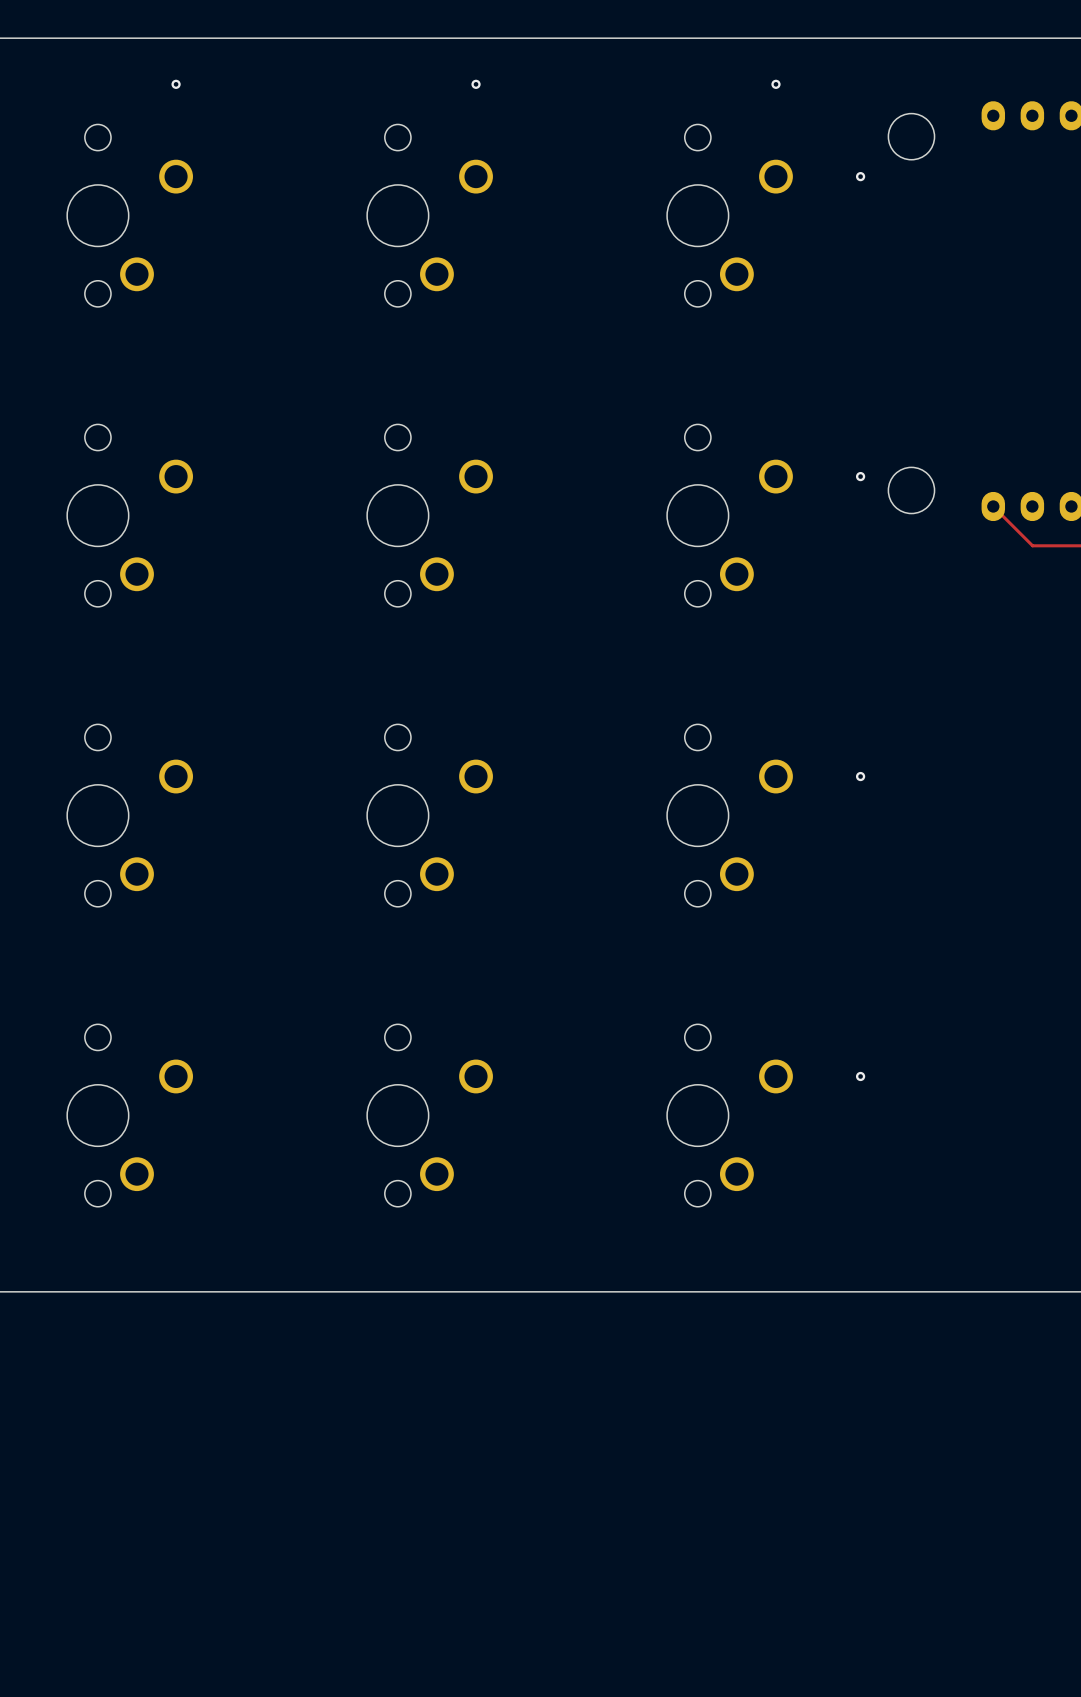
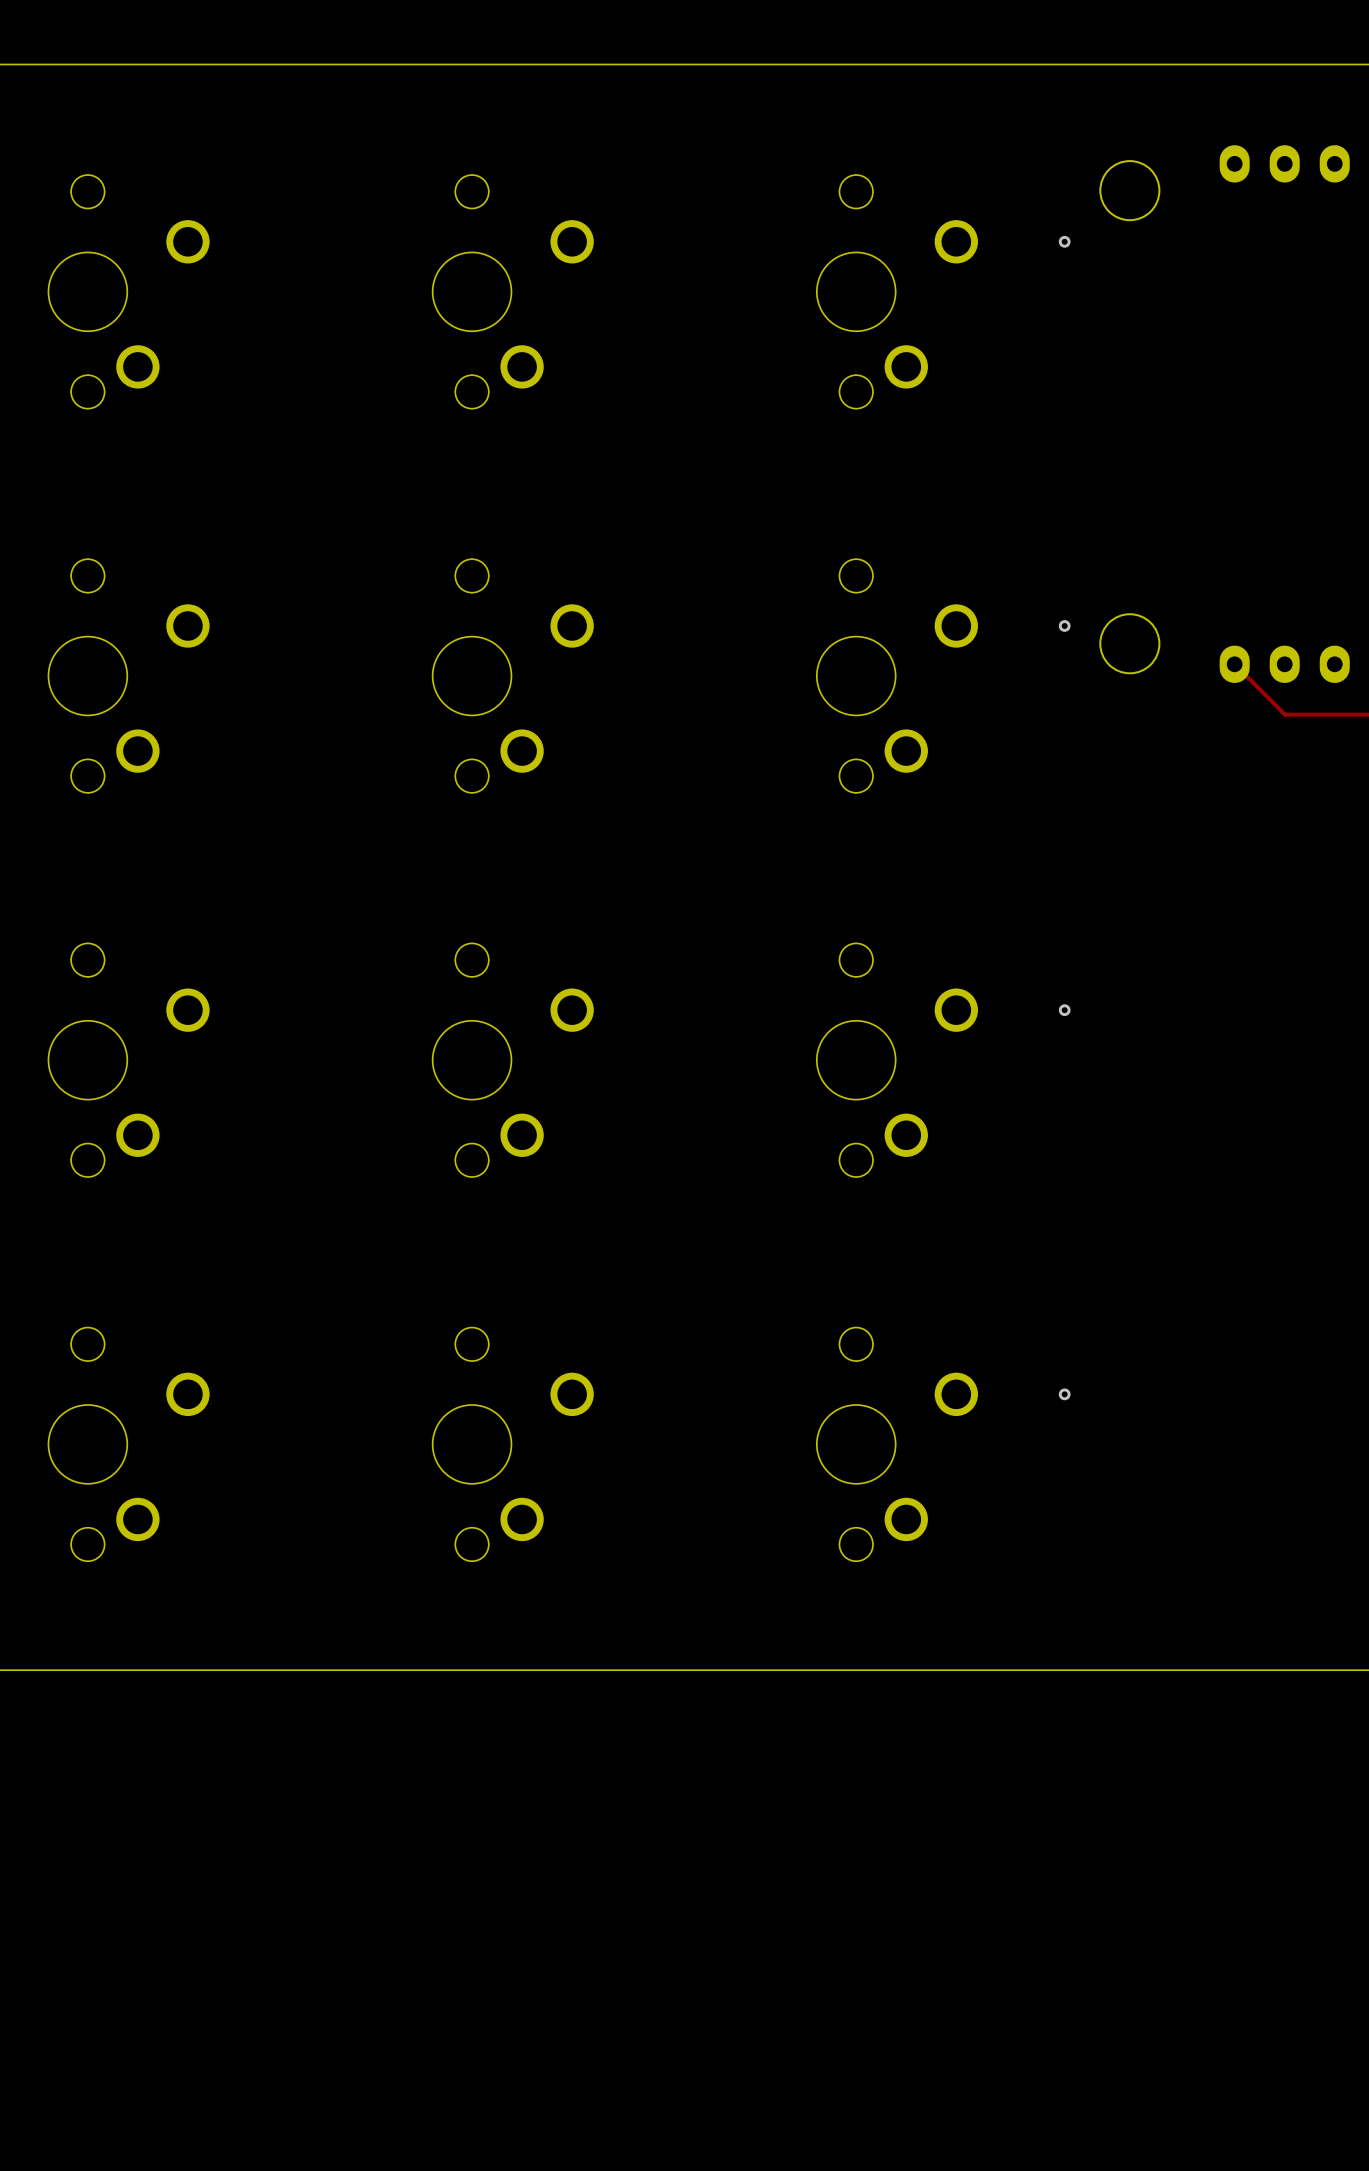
via: (176, 84) -> none
via: (476, 84) -> none
via: (775, 84) -> none

